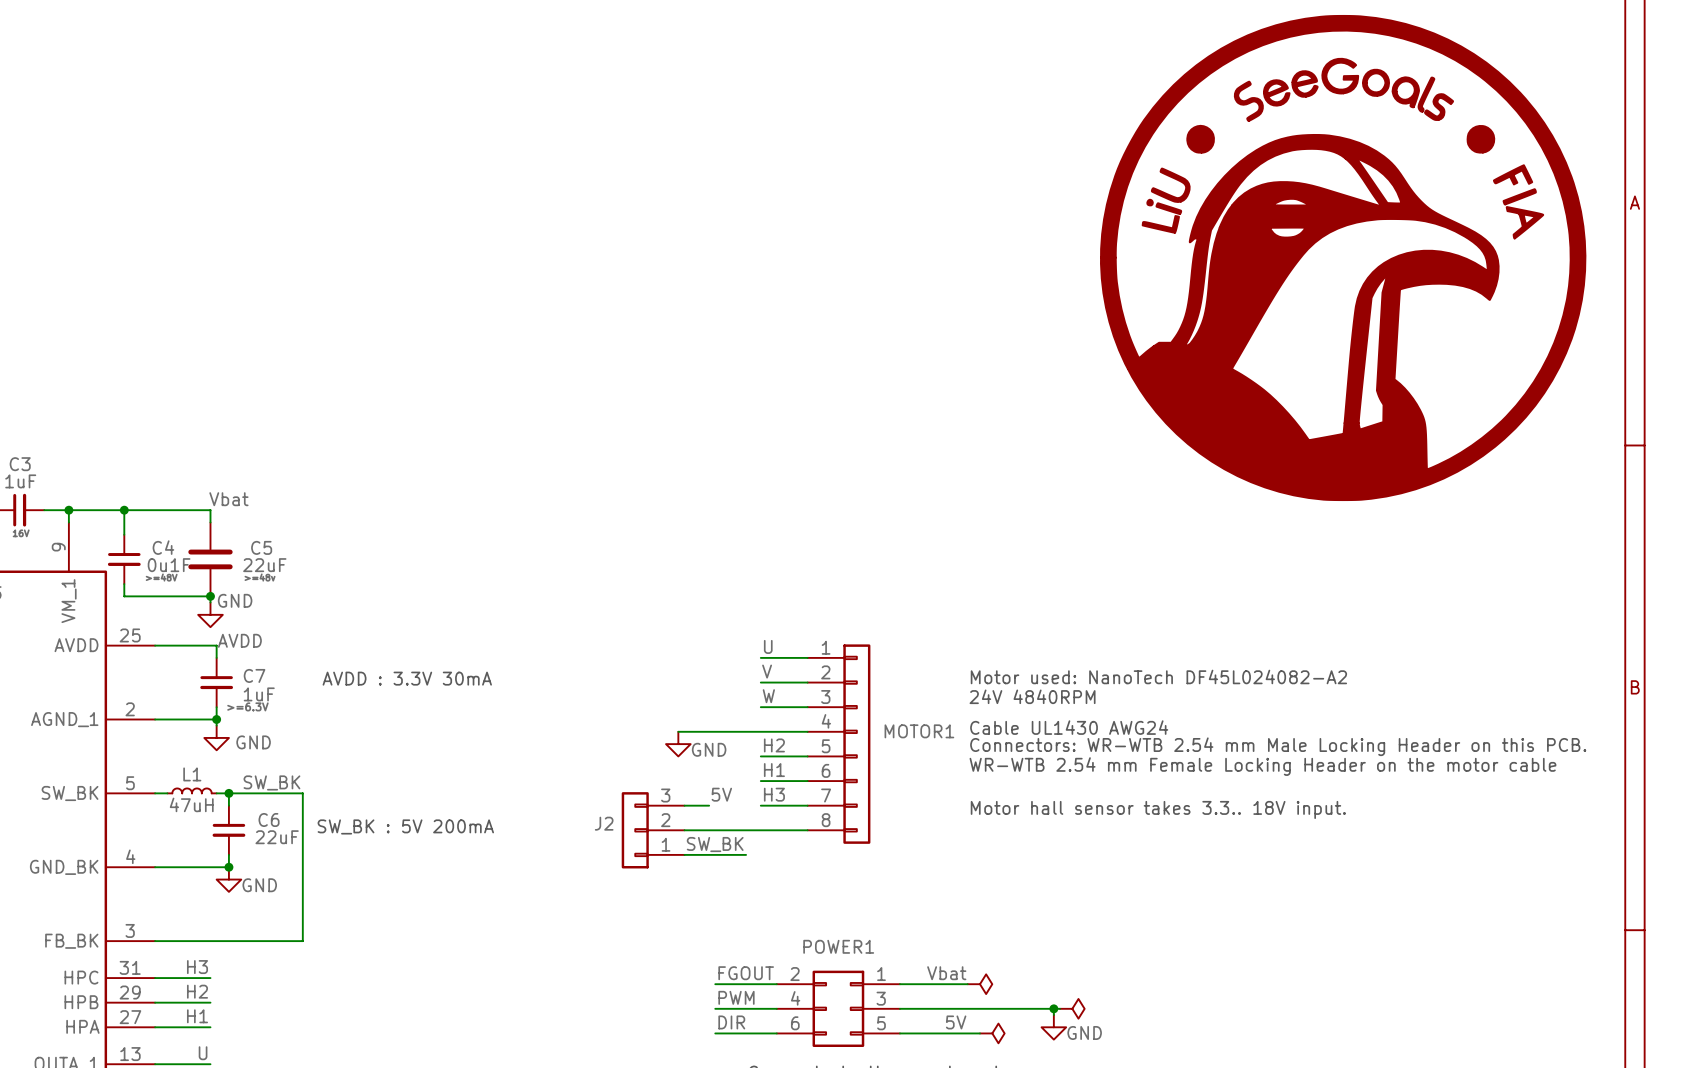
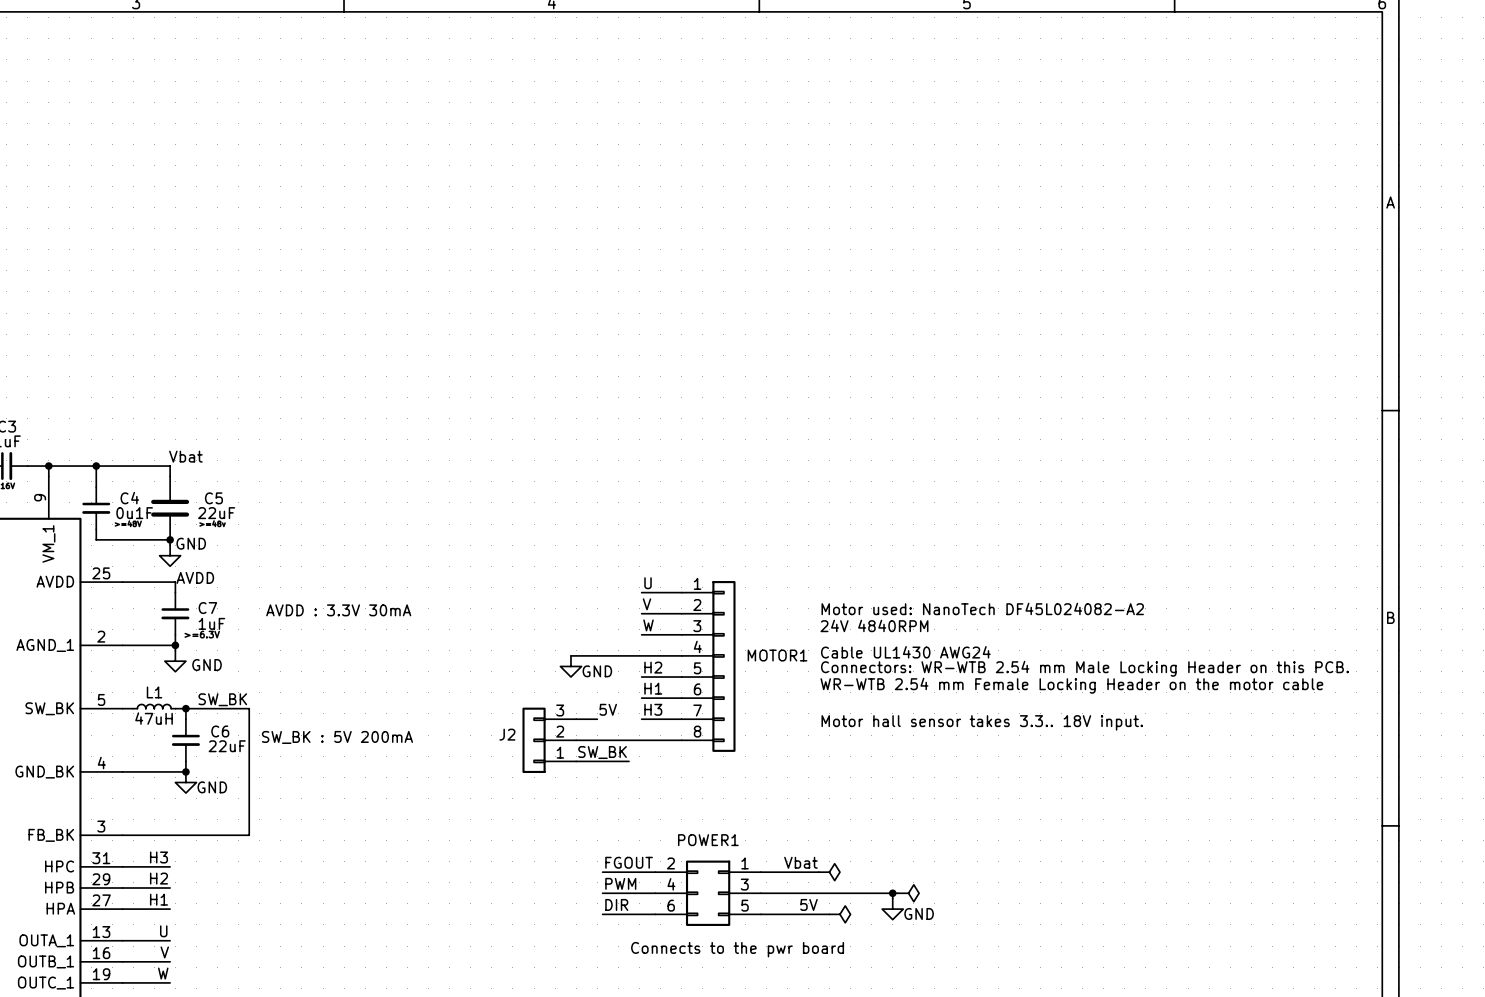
power symbol: (1343, 258) -> none

